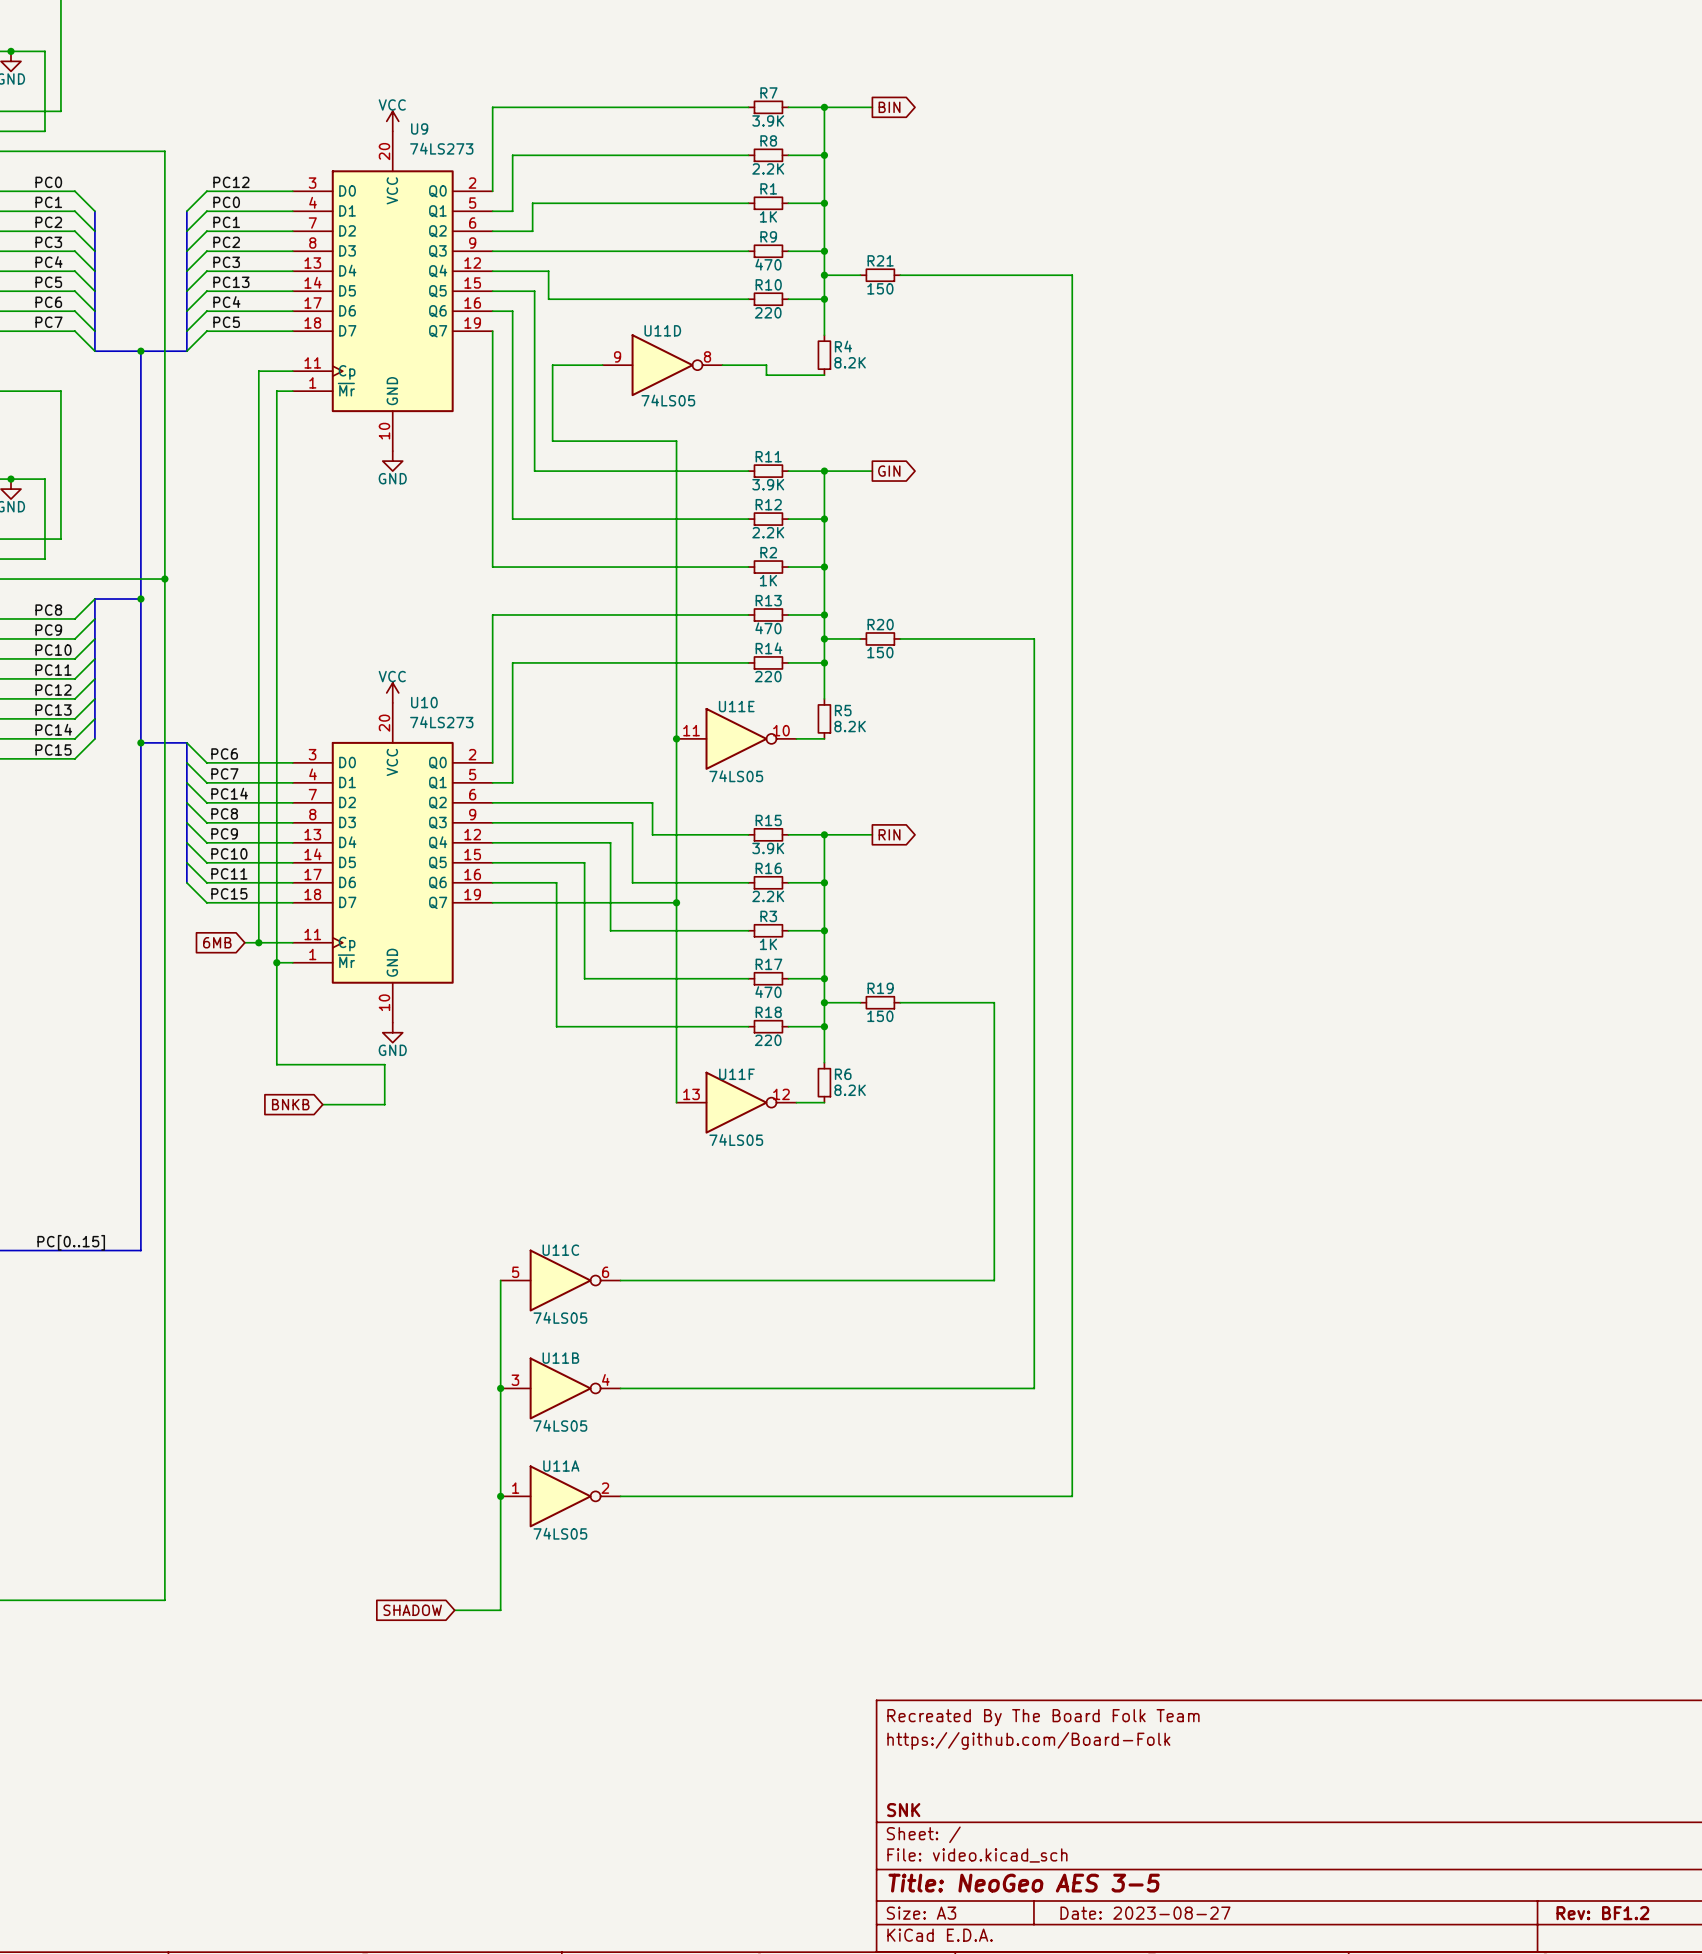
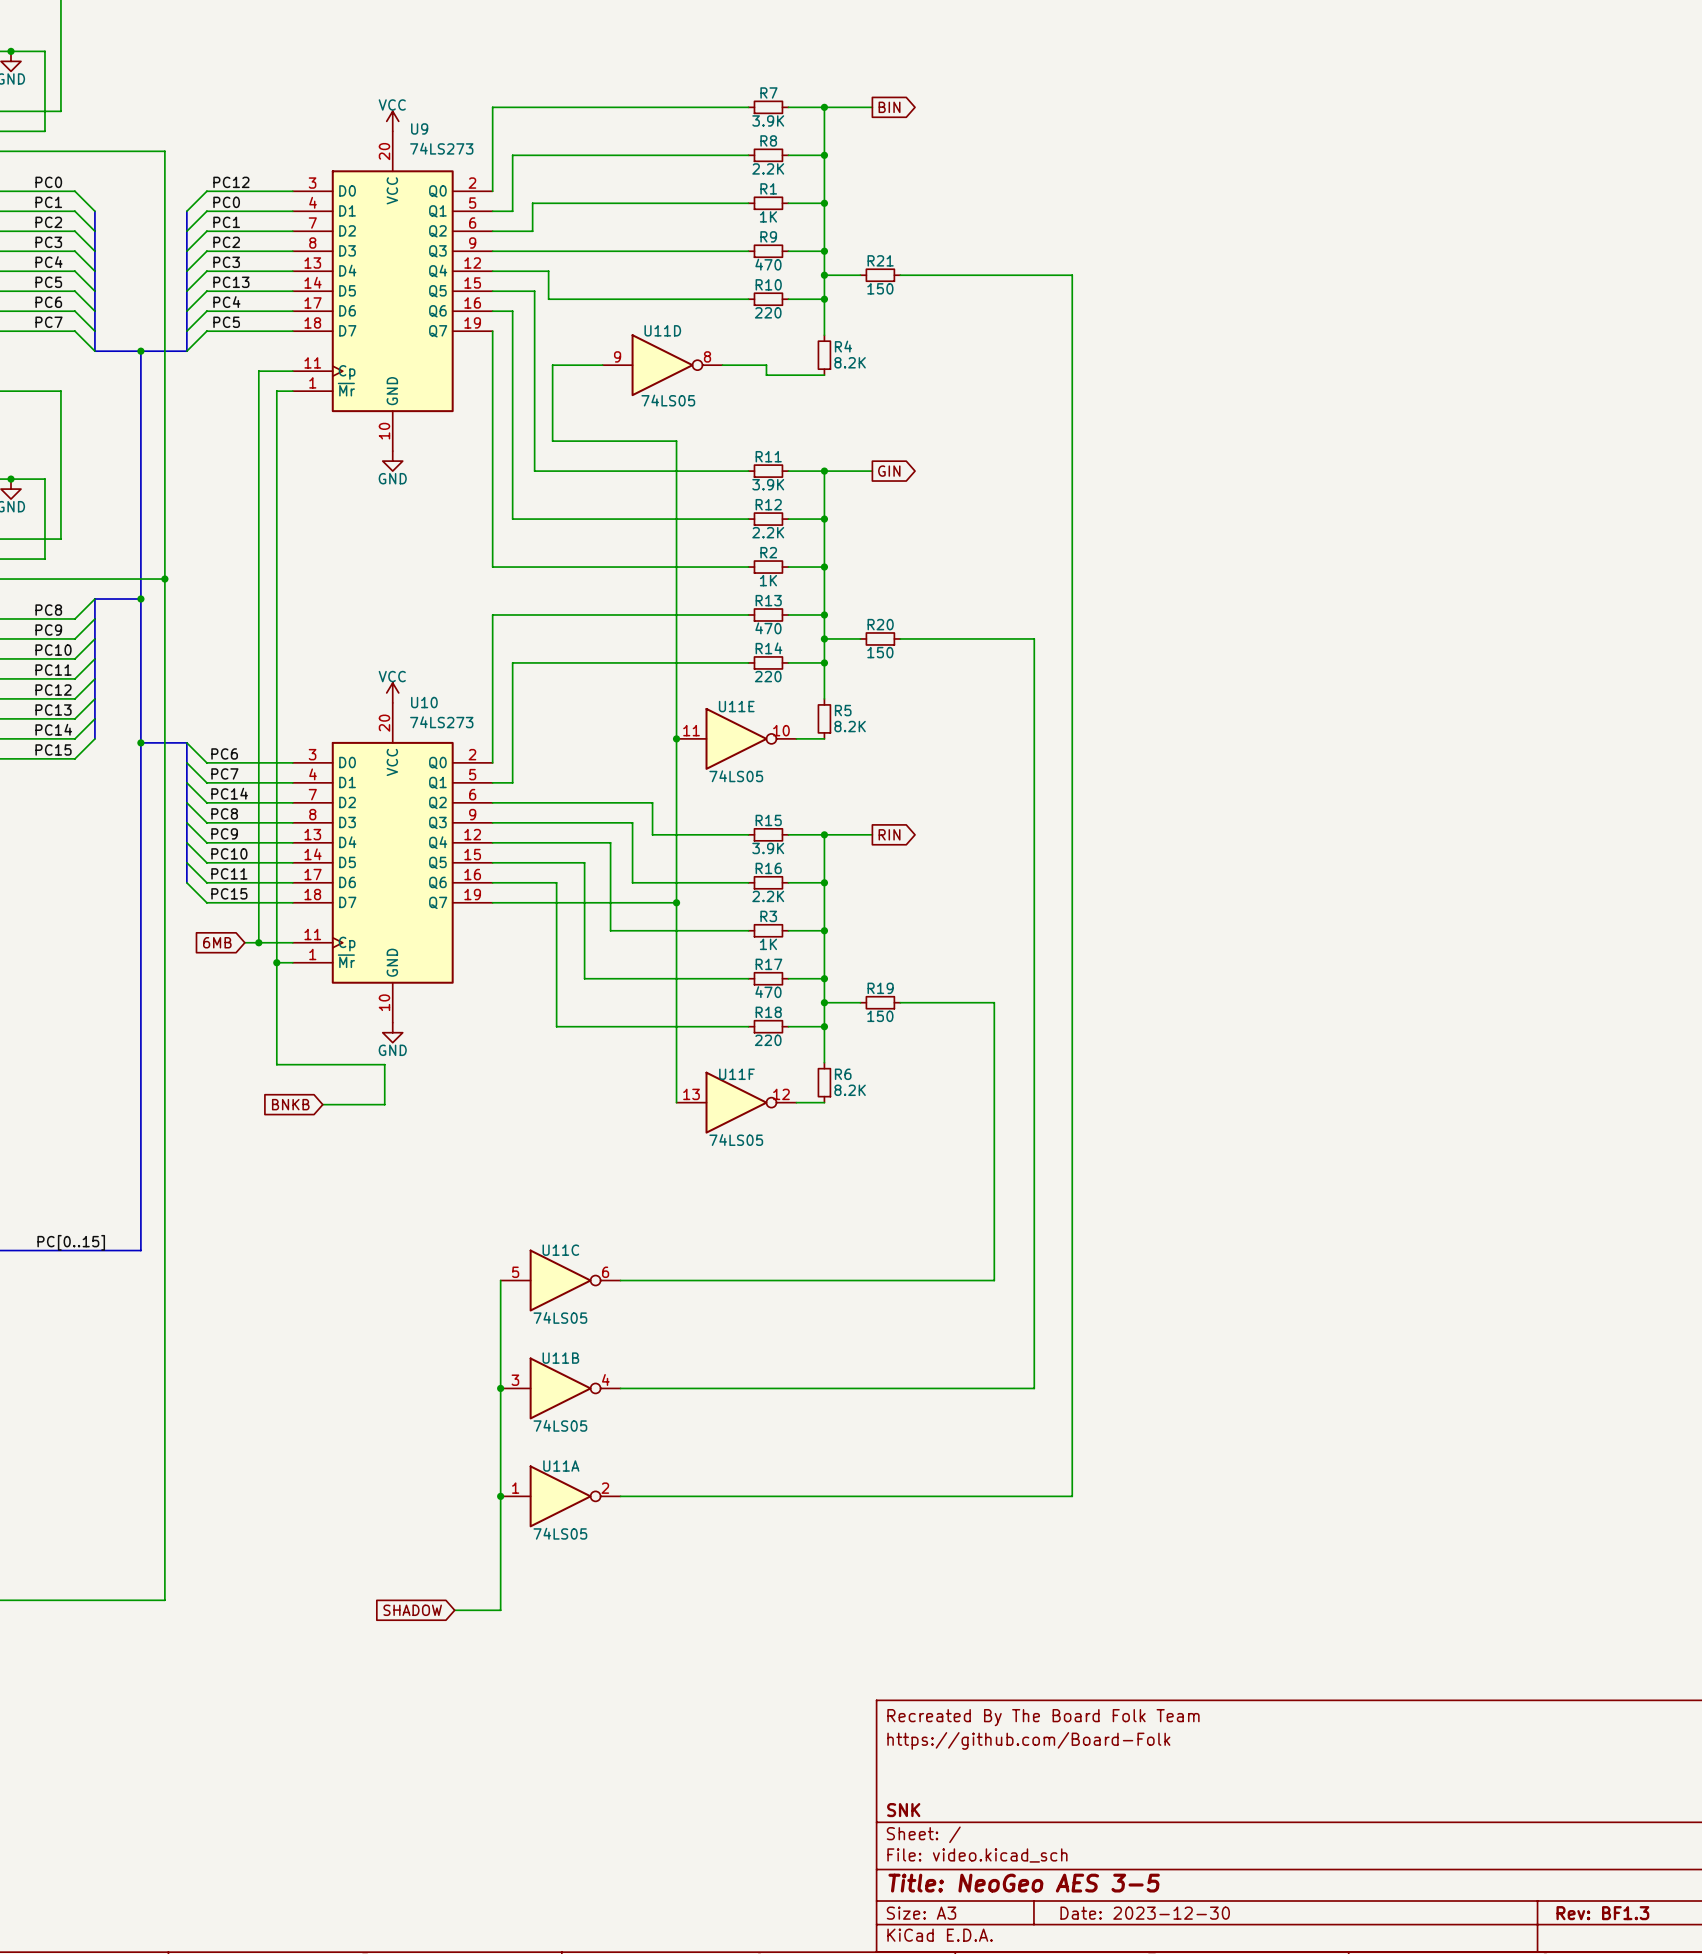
title block: Date: 2023-08-27 (1145, 1913) -> Date: 2023-12-30 (1145, 1913)
title block: Rev: BF1.2 (1602, 1913) -> Rev: BF1.3 (1602, 1913)

